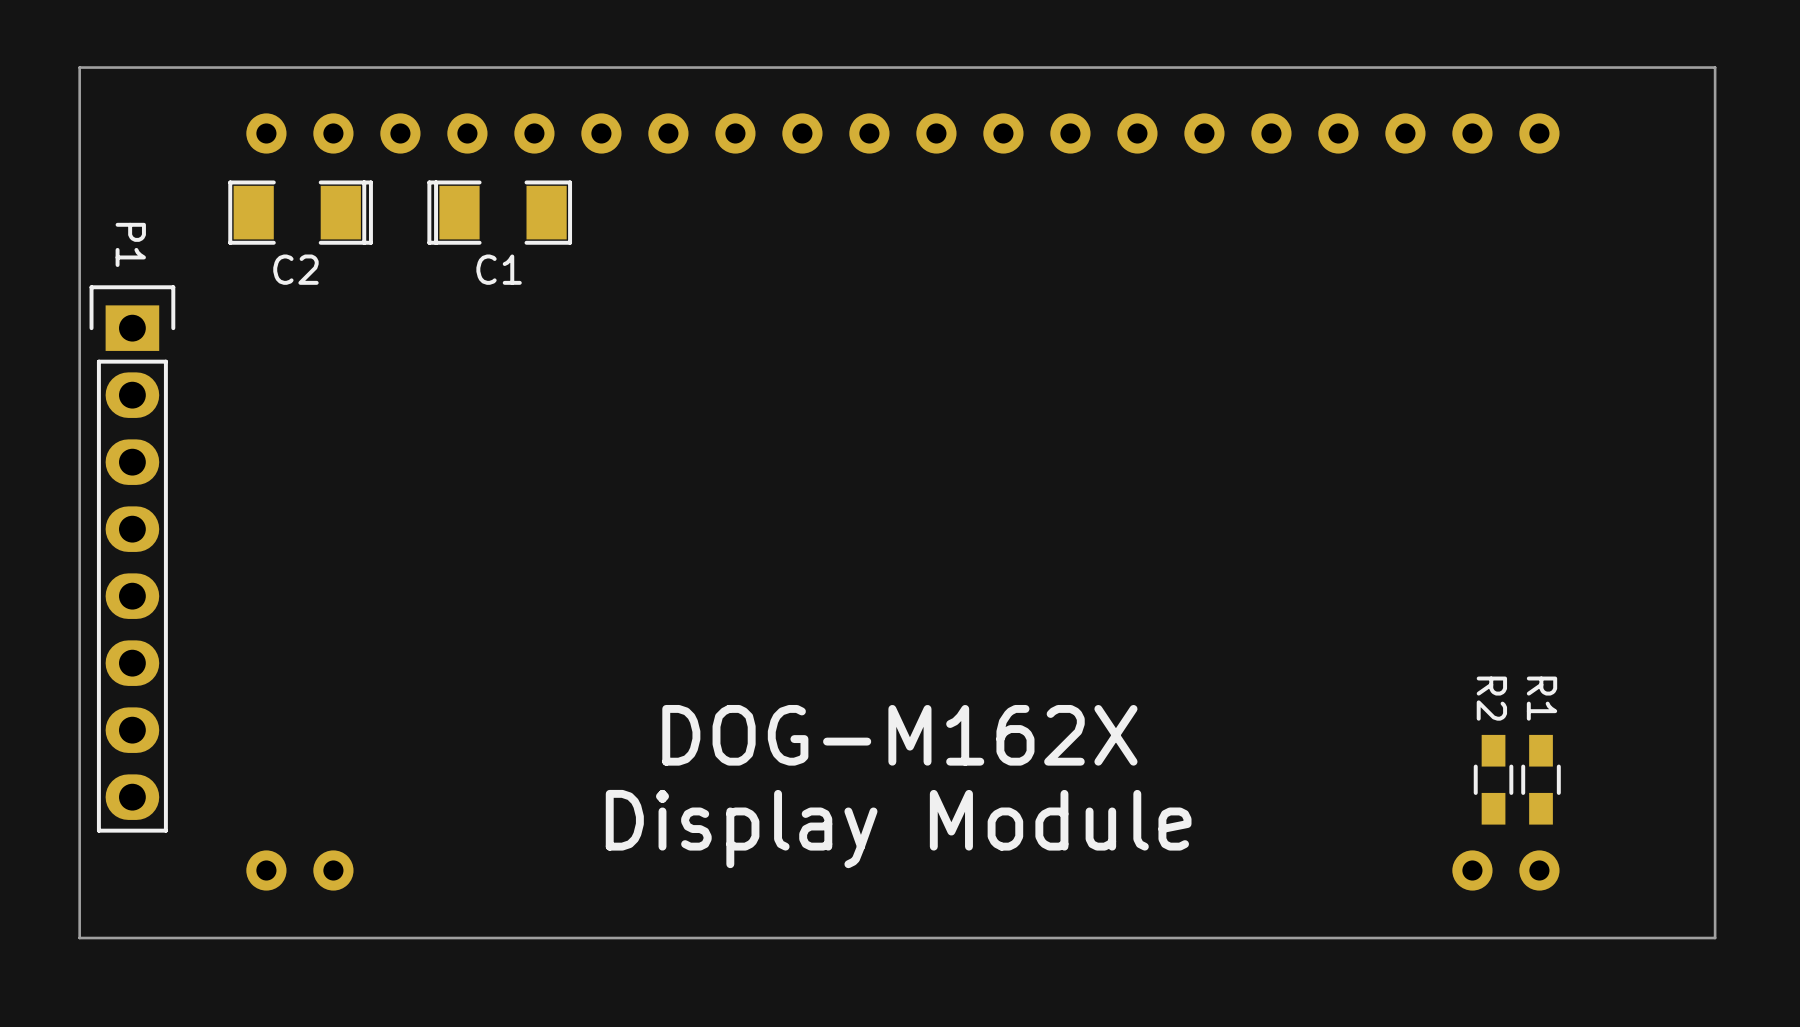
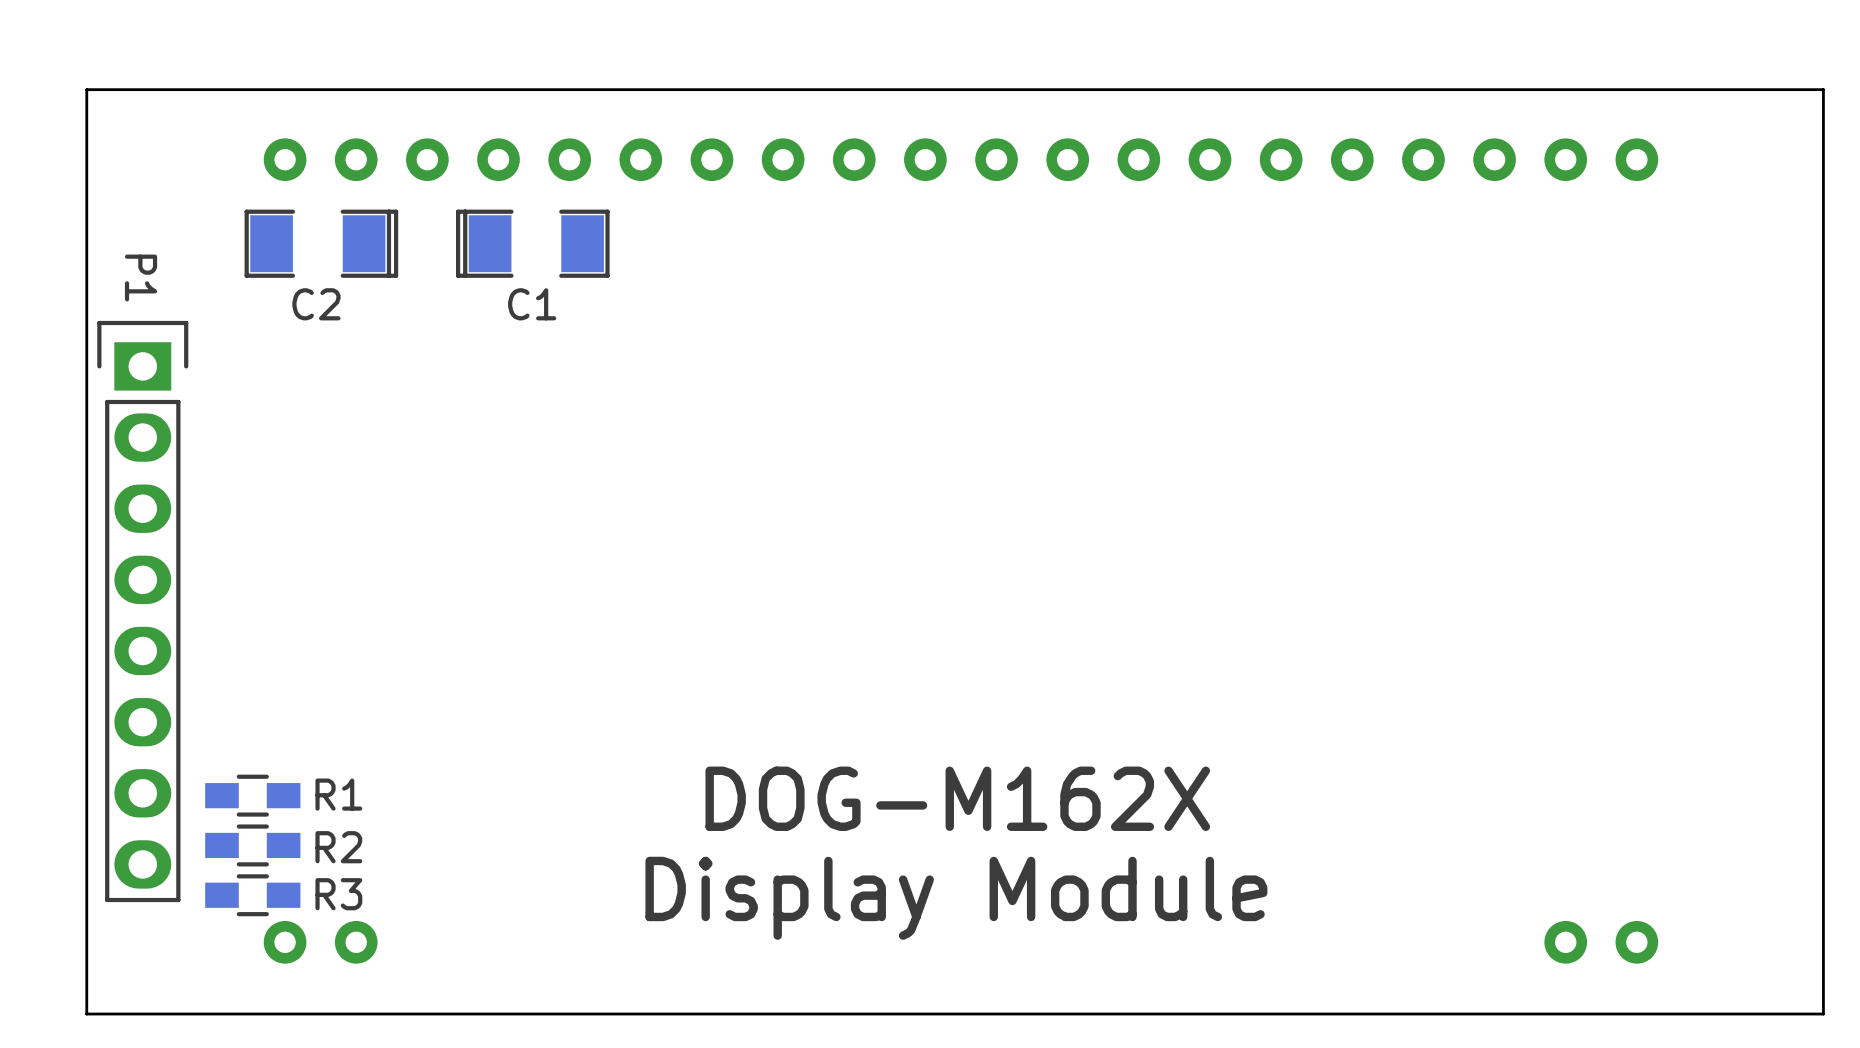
R2 rotation: 0° (1493, 779) -> 90° clockwise (252, 845)
R2 position: (1493, 779) -> (252, 845)
R1 rotation: 0° (1541, 779) -> 90° clockwise (252, 795)
R1 position: (1541, 779) -> (252, 795)
R3: none -> (252, 895)

